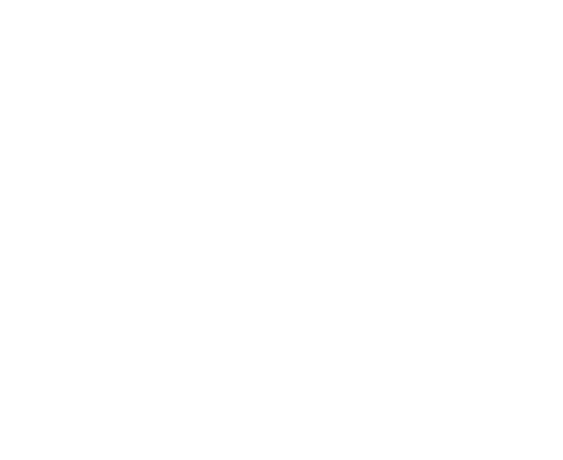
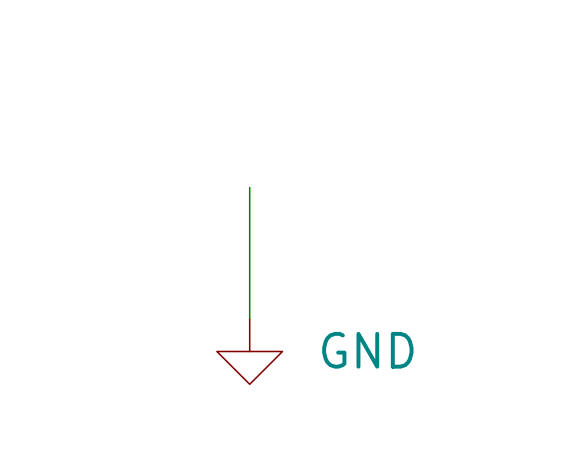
wire: none -> (249, 187) (249, 318)
power symbol: none -> GND (249, 351)

